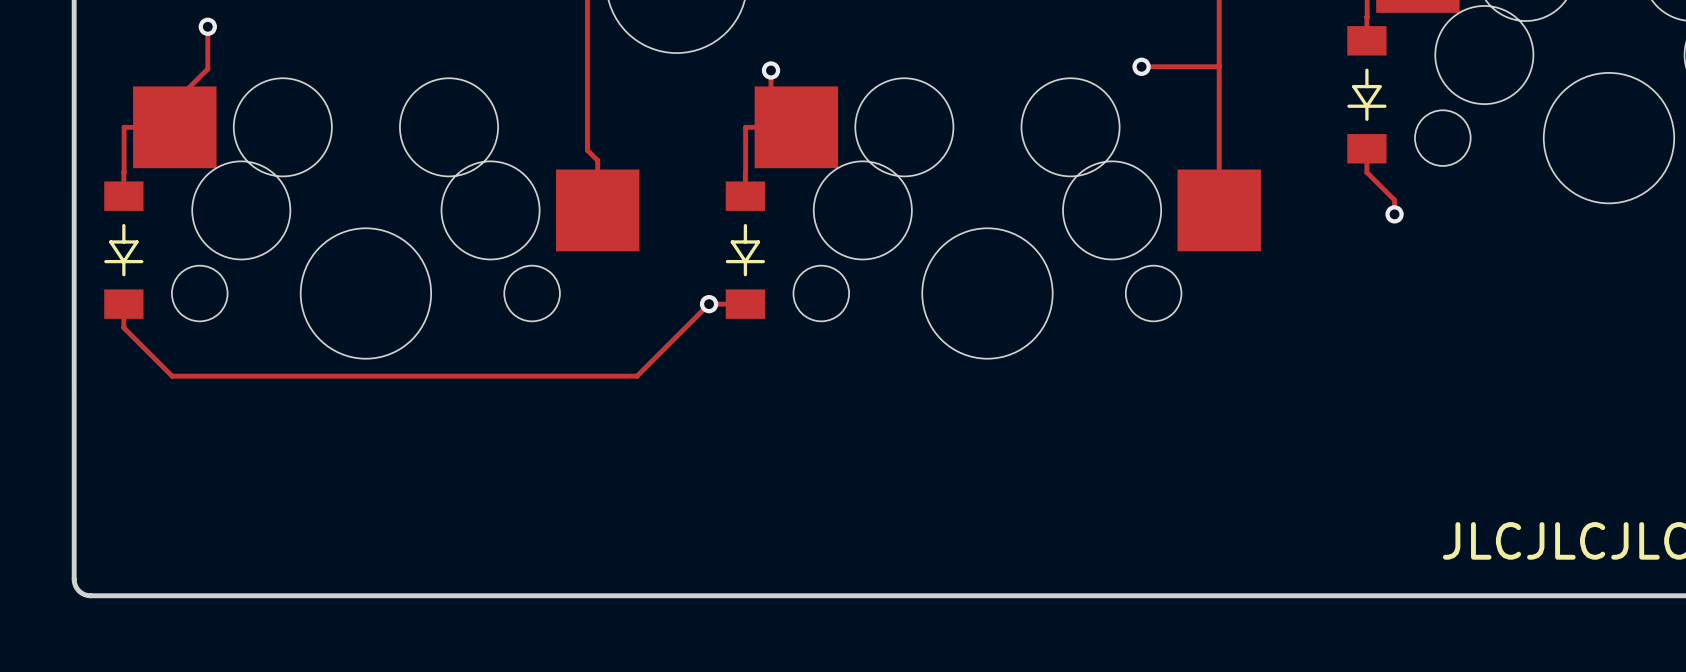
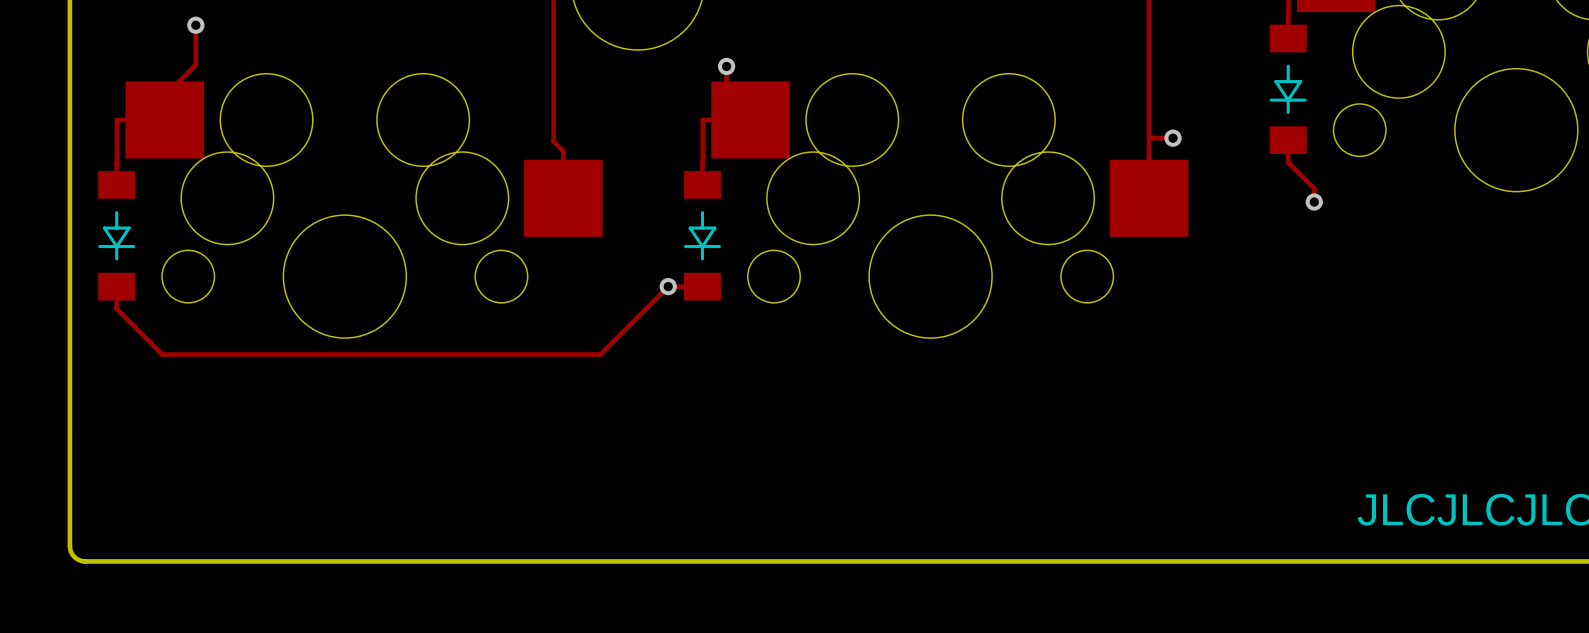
track: (1141, 66) (1219, 66) -> none
via position: (1141, 66) -> (1173, 138)
track: none -> (1149, 138) (1173, 138)

